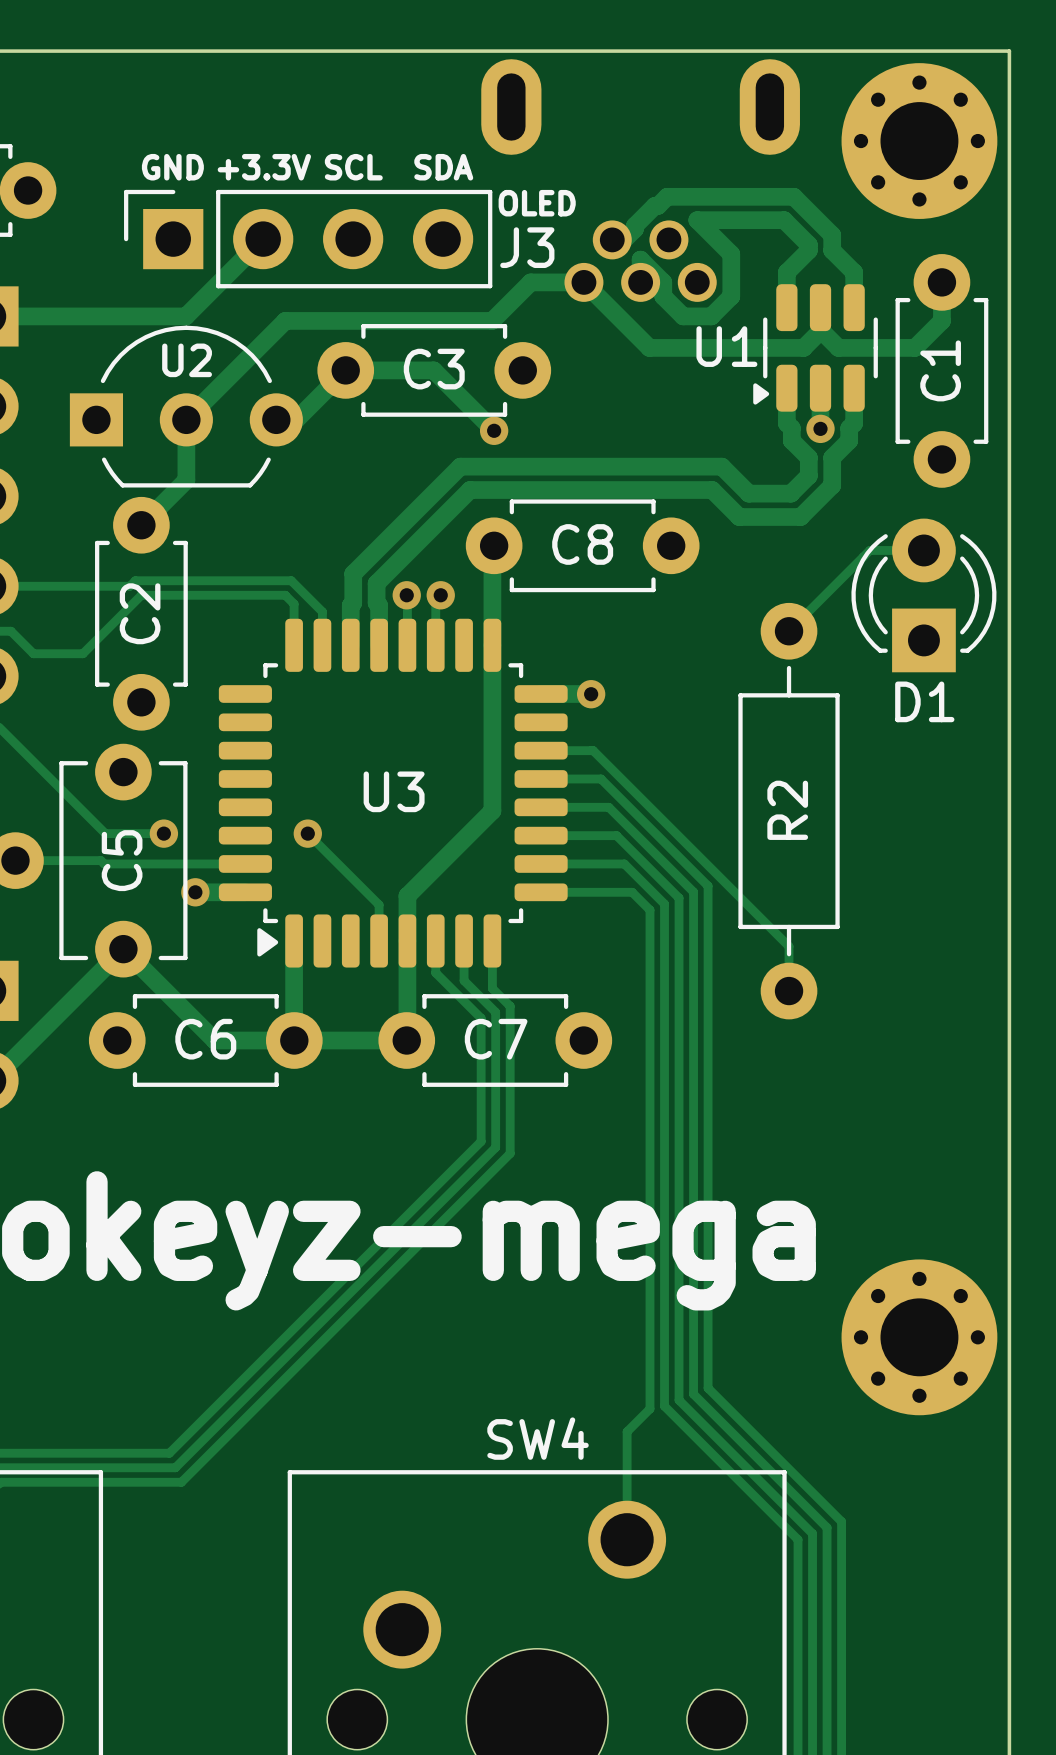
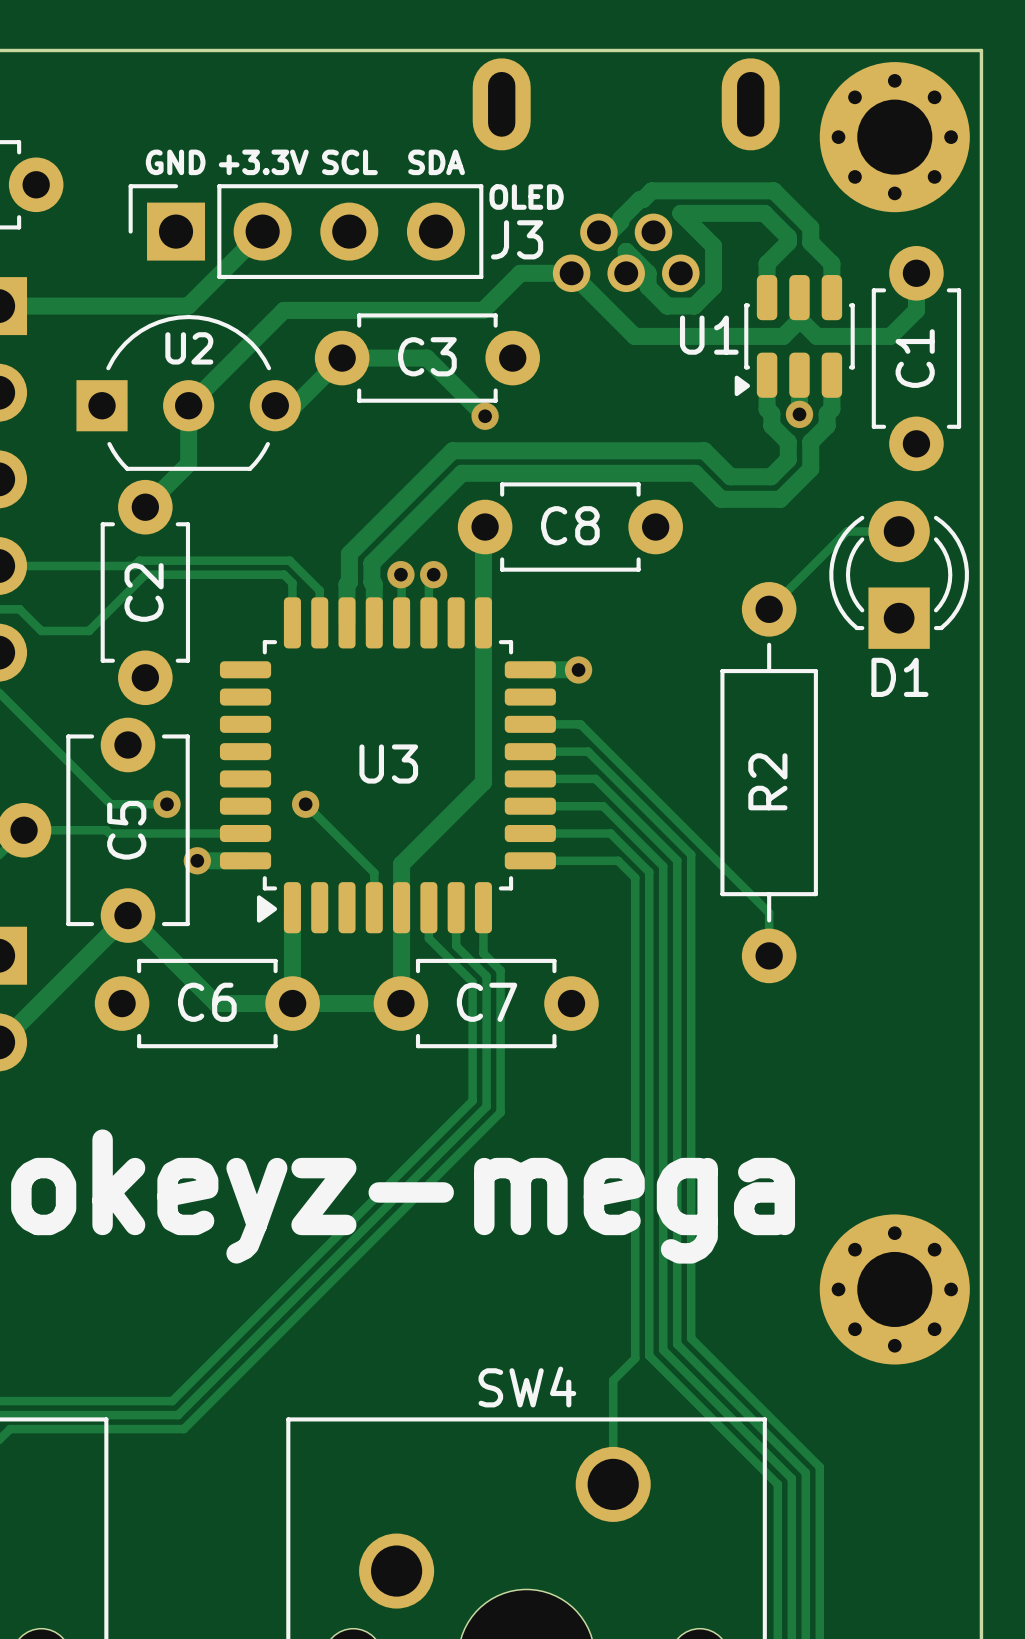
U1 footprint: [753, 284, 878, 412] -> [734, 275, 855, 398]

